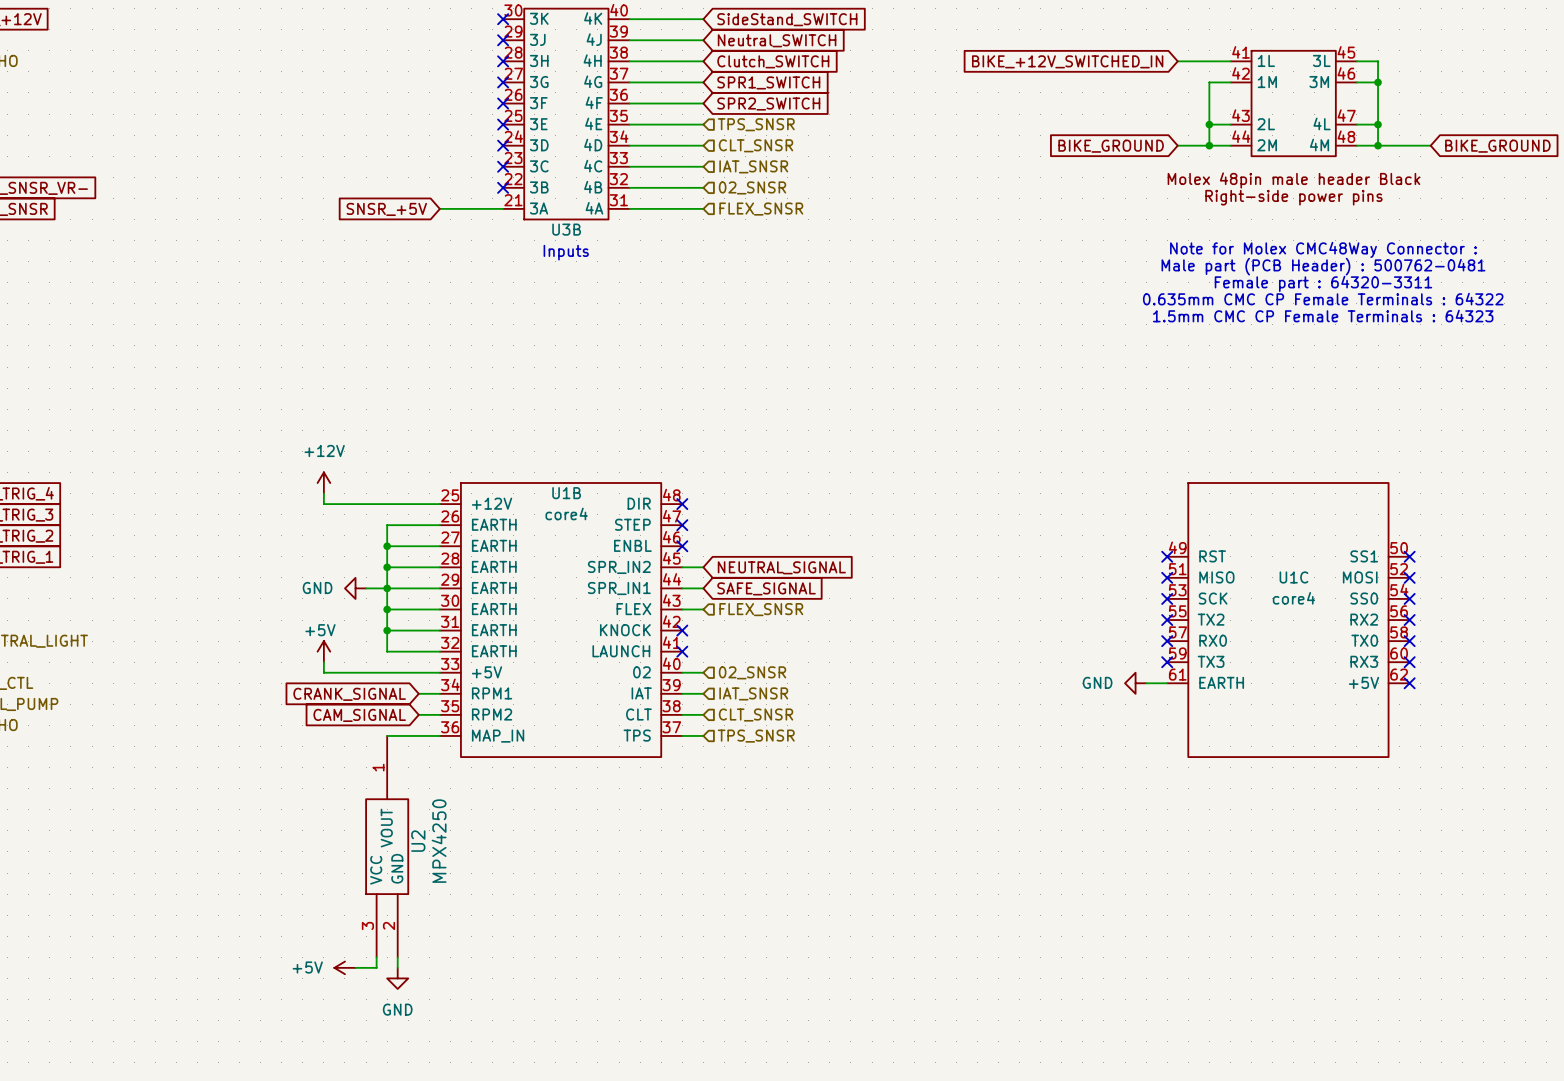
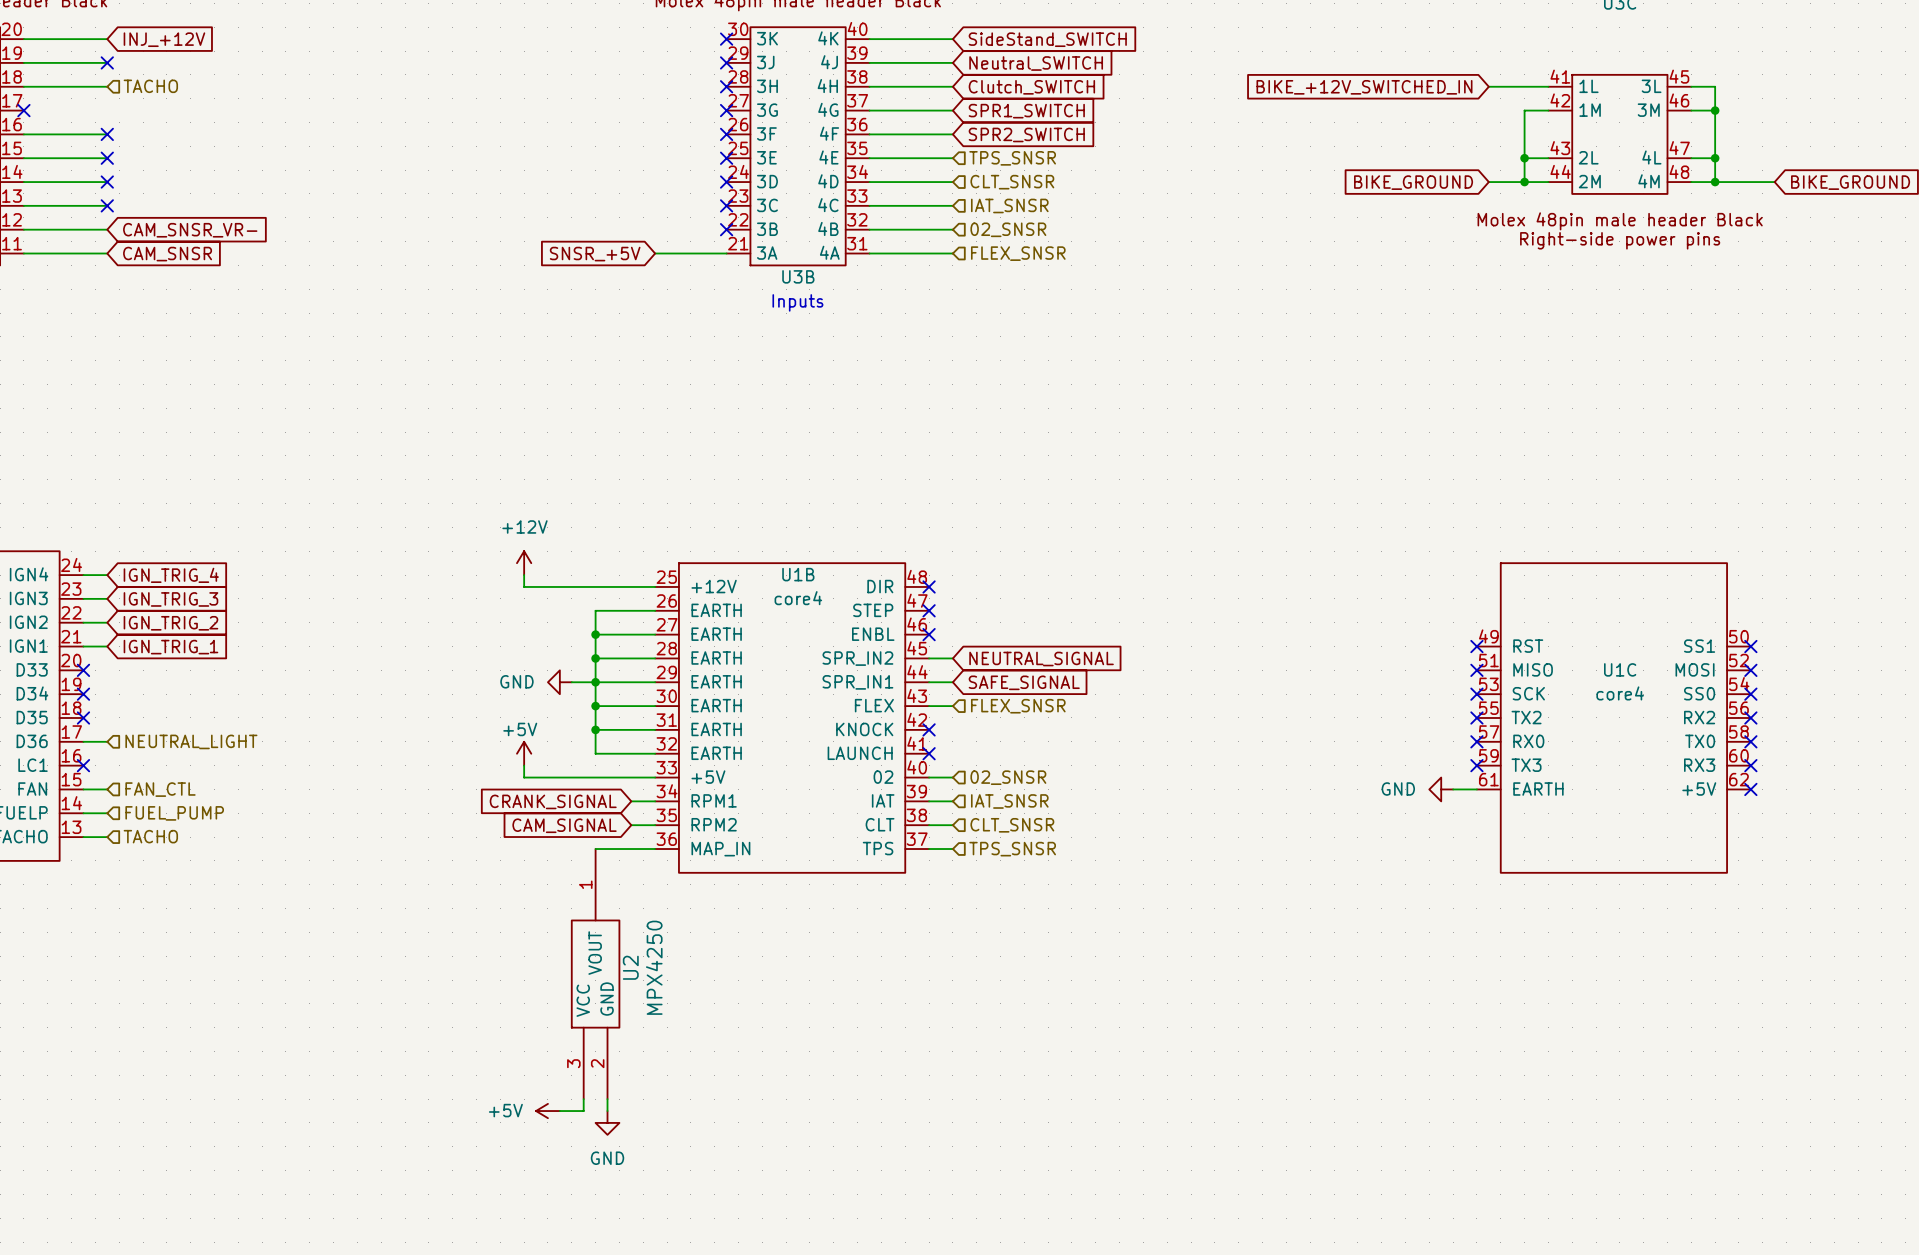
text: Note for Molex CMC48Way Connector : (1323, 249) -> none
text: Male part (PCB Header) : 500762-0481 (1323, 266) -> none
text: Female part : 64320-3311 (1323, 283) -> none
text: 0.635mm CMC CP Female Terminals : 64322 (1323, 299) -> none
text: 1.5mm CMC CP Female Terminals : 64323 (1323, 316) -> none

